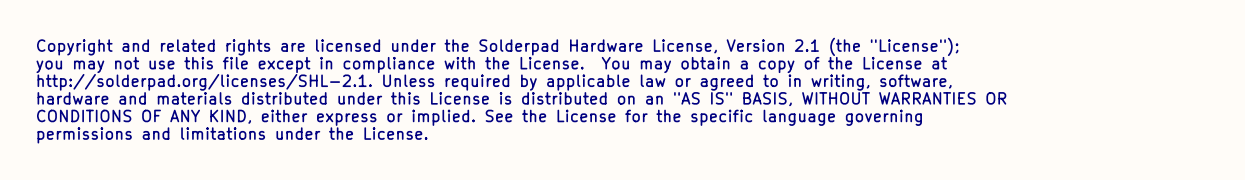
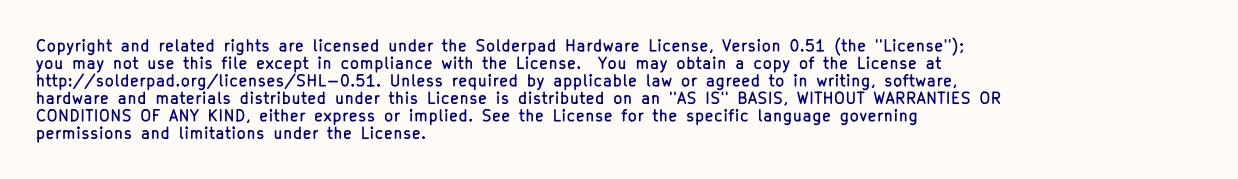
text: Copyright and related rights are licensed under the Solderpad Hardware License, Version 2.1 (the "License"); (497, 46) -> Copyright and related rights are licensed under the Solderpad Hardware License, Version 0.51 (the "License"); (499, 46)
text: http://solderpad.org/licenses/SHL-2.1. Unless required by applicable law or agreed to in writing, software, (494, 82) -> http://solderpad.org/licenses/SHL-0.51. Unless required by applicable law or agreed to in writing, software, (496, 81)

